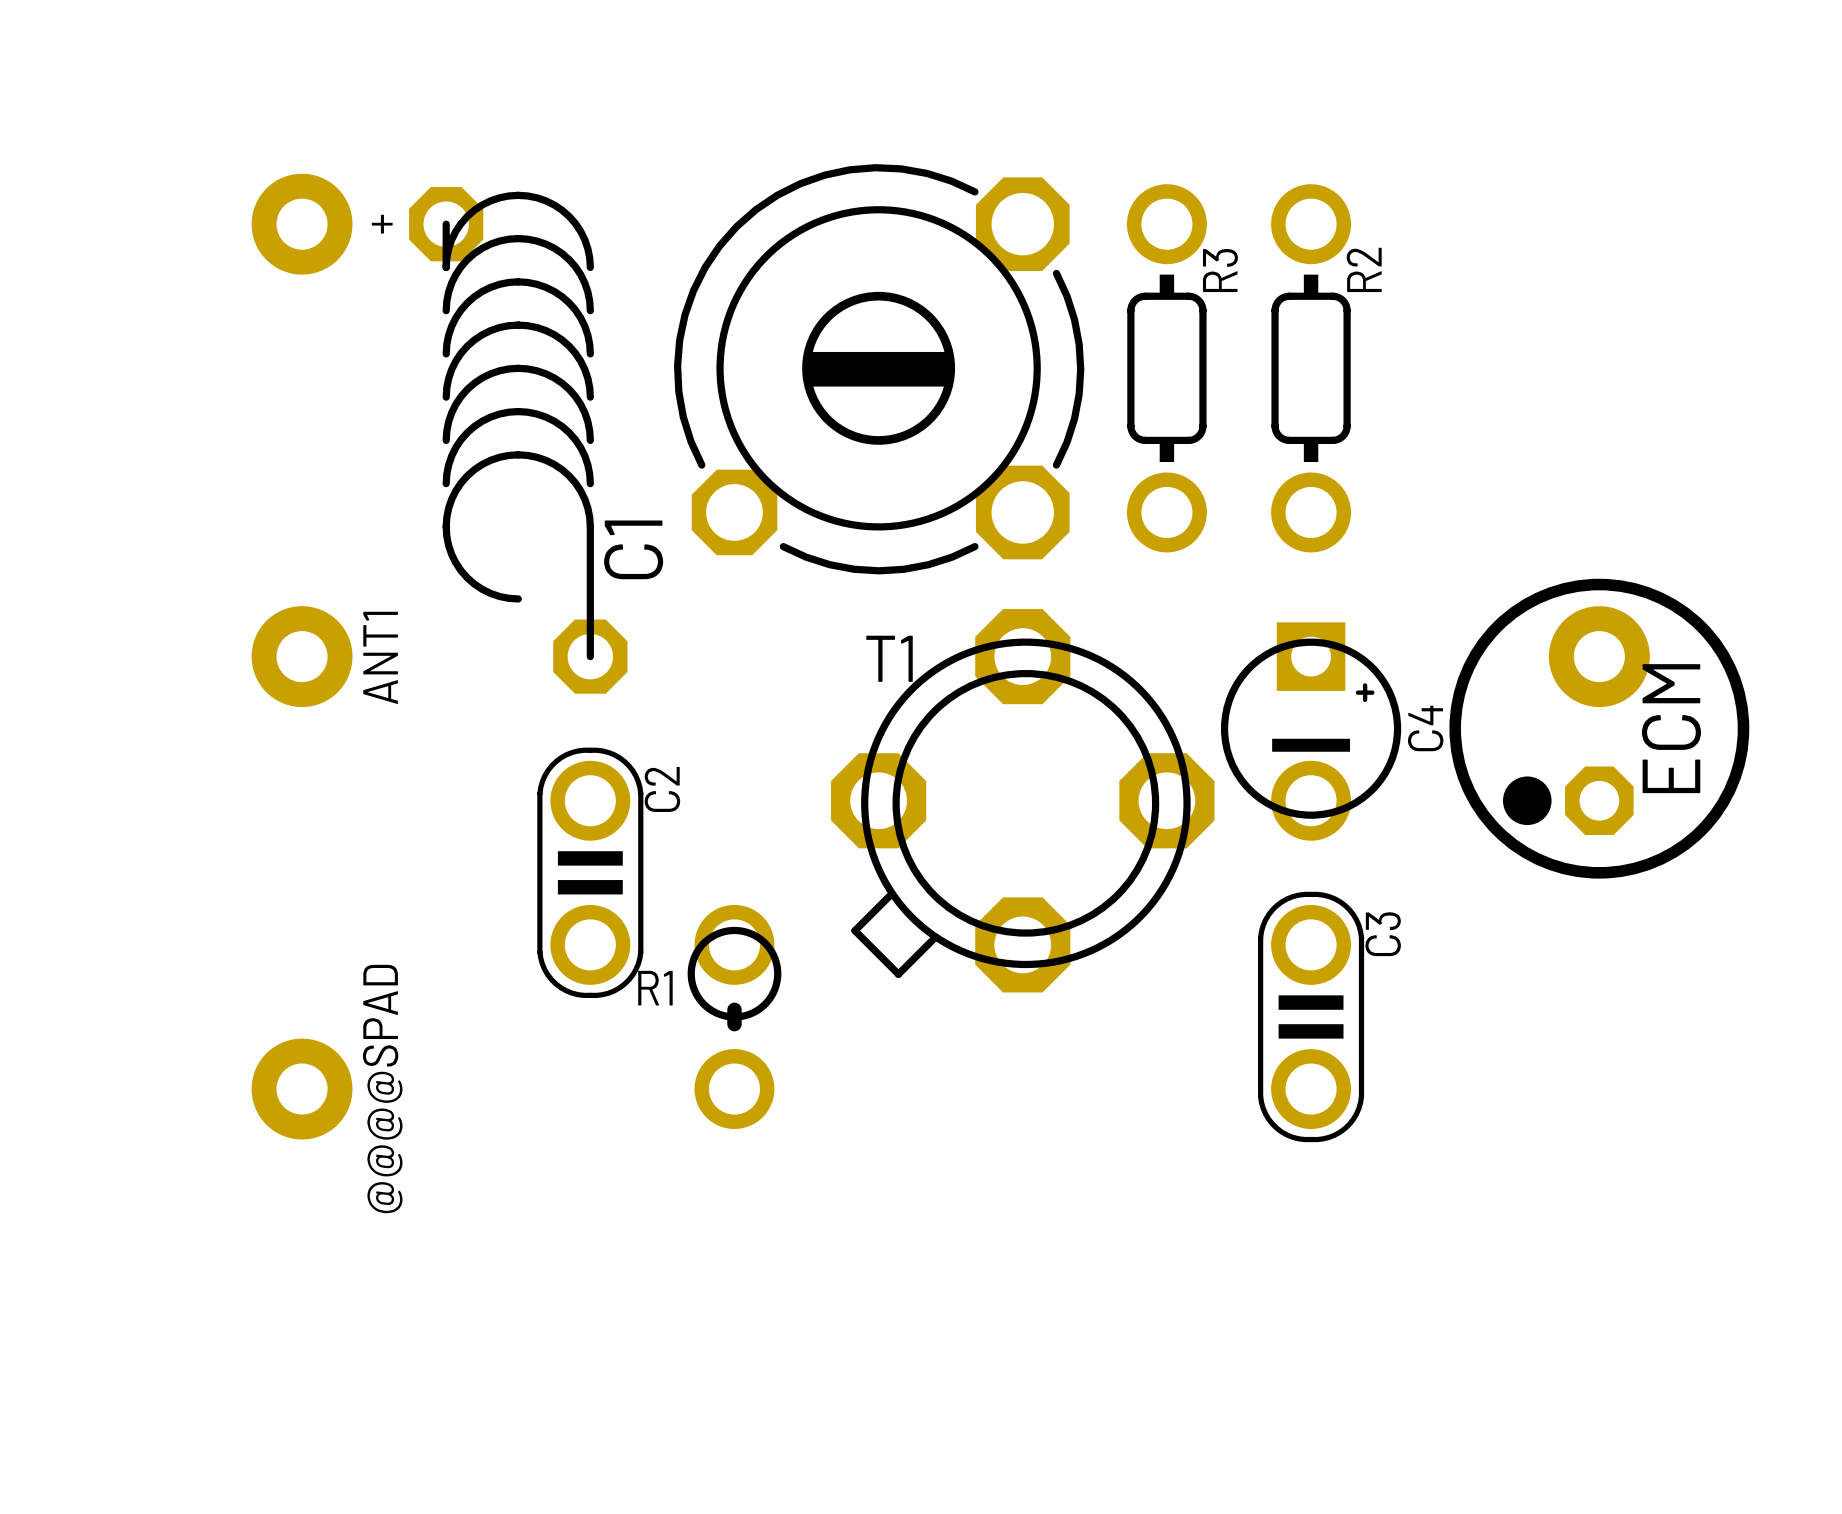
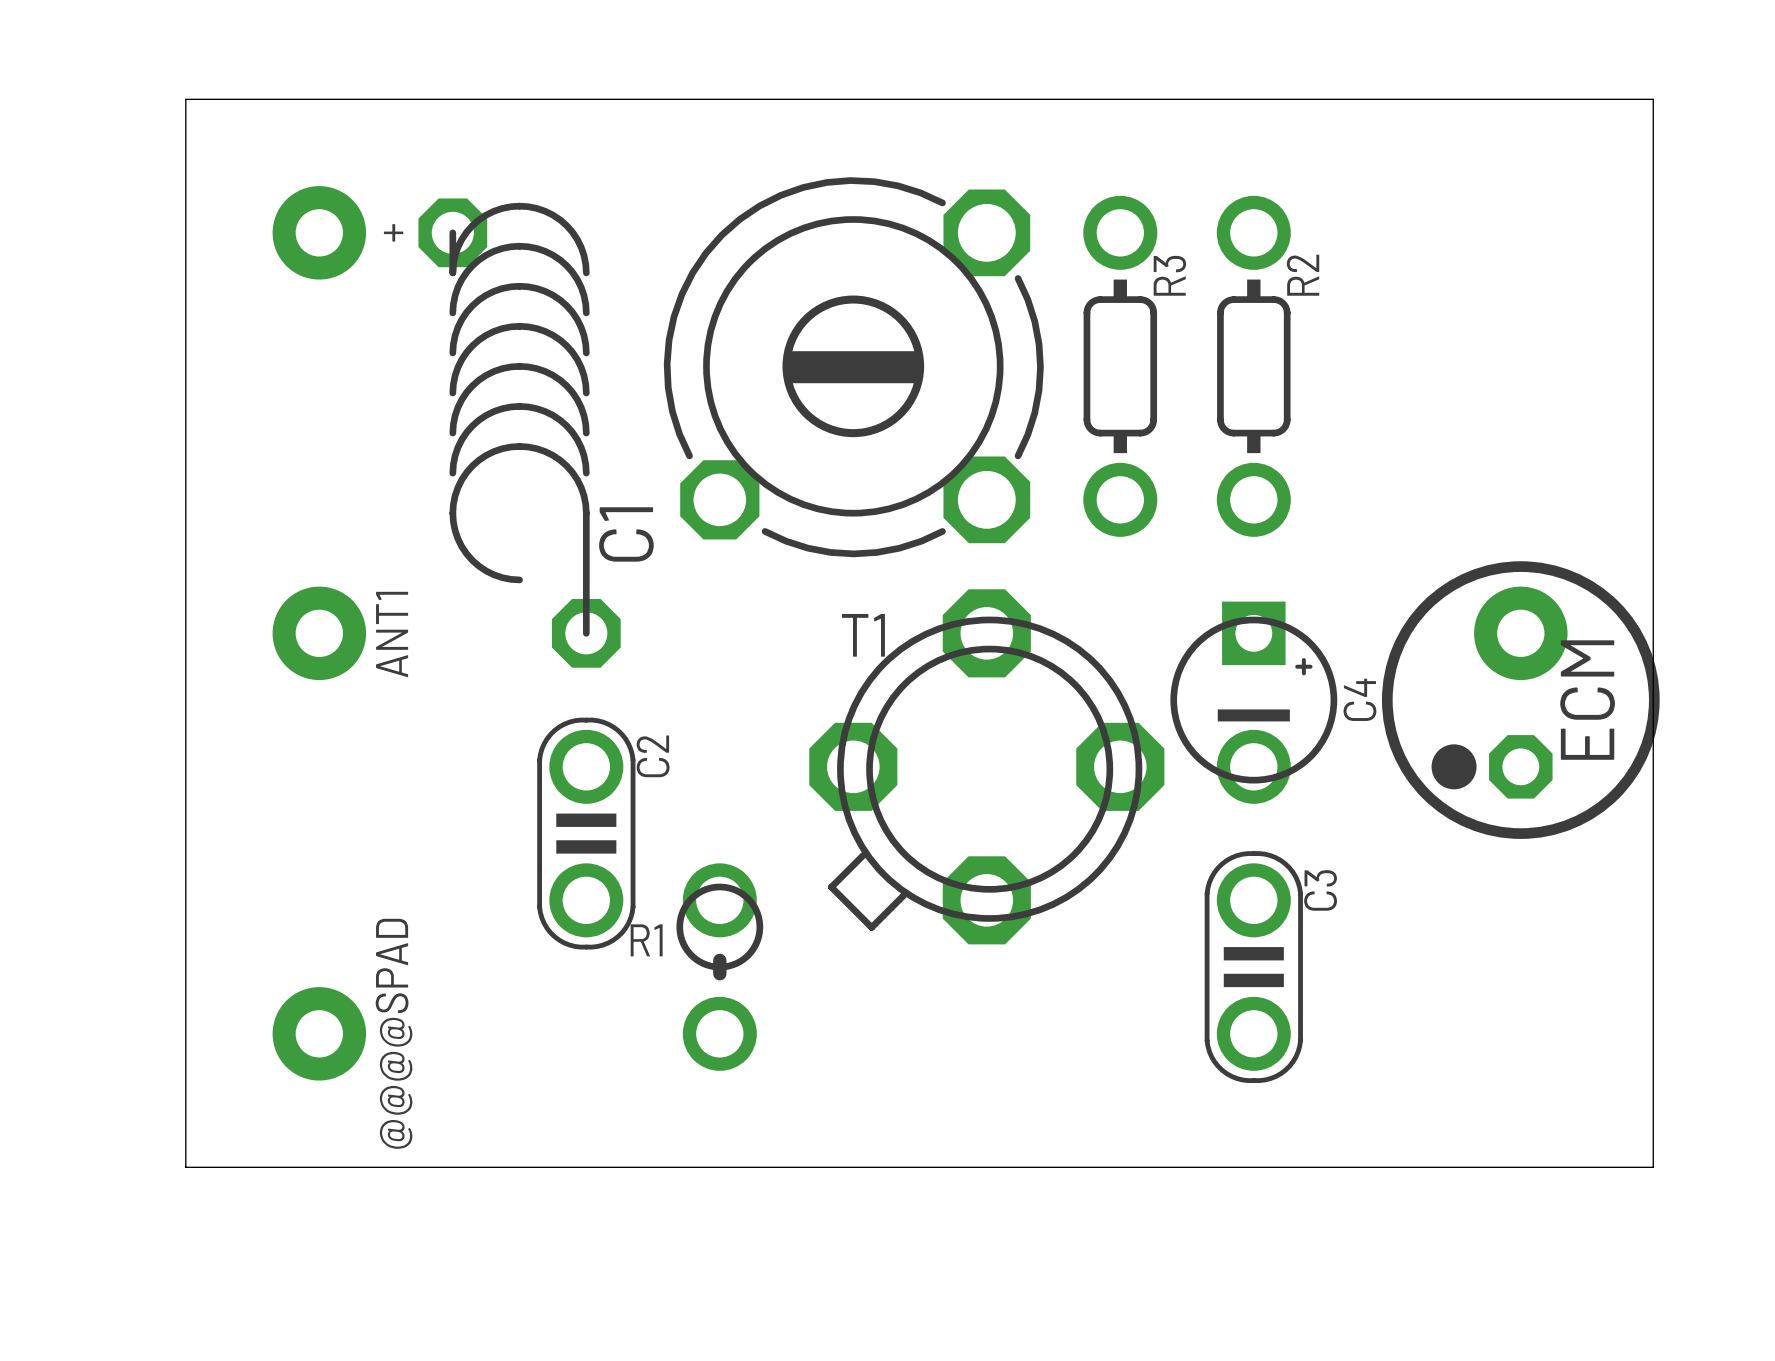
board edge: none -> (185, 99) (1653, 99) (1653, 1167) (185, 1167) (185, 99)

